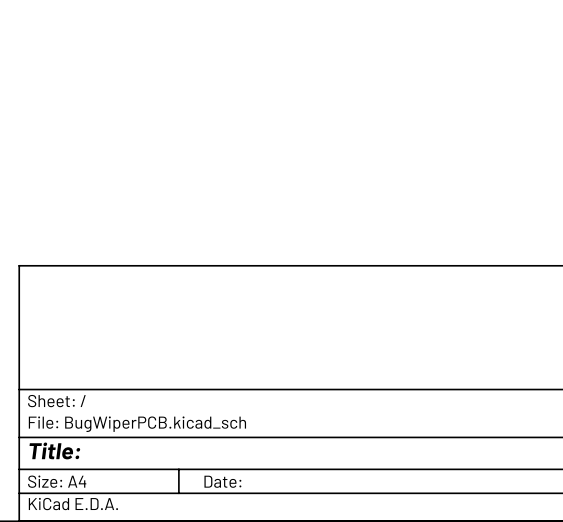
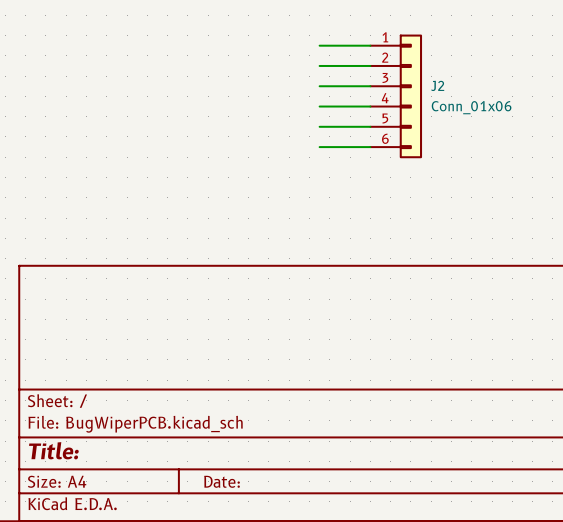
wire: none -> (319, 45) (370, 45)
wire: none -> (319, 65) (370, 65)
wire: none -> (319, 86) (370, 86)
J2: none -> Conn_01x06 (396, 96)
wire: none -> (319, 106) (370, 106)
wire: none -> (319, 126) (370, 126)
wire: none -> (319, 147) (370, 147)

